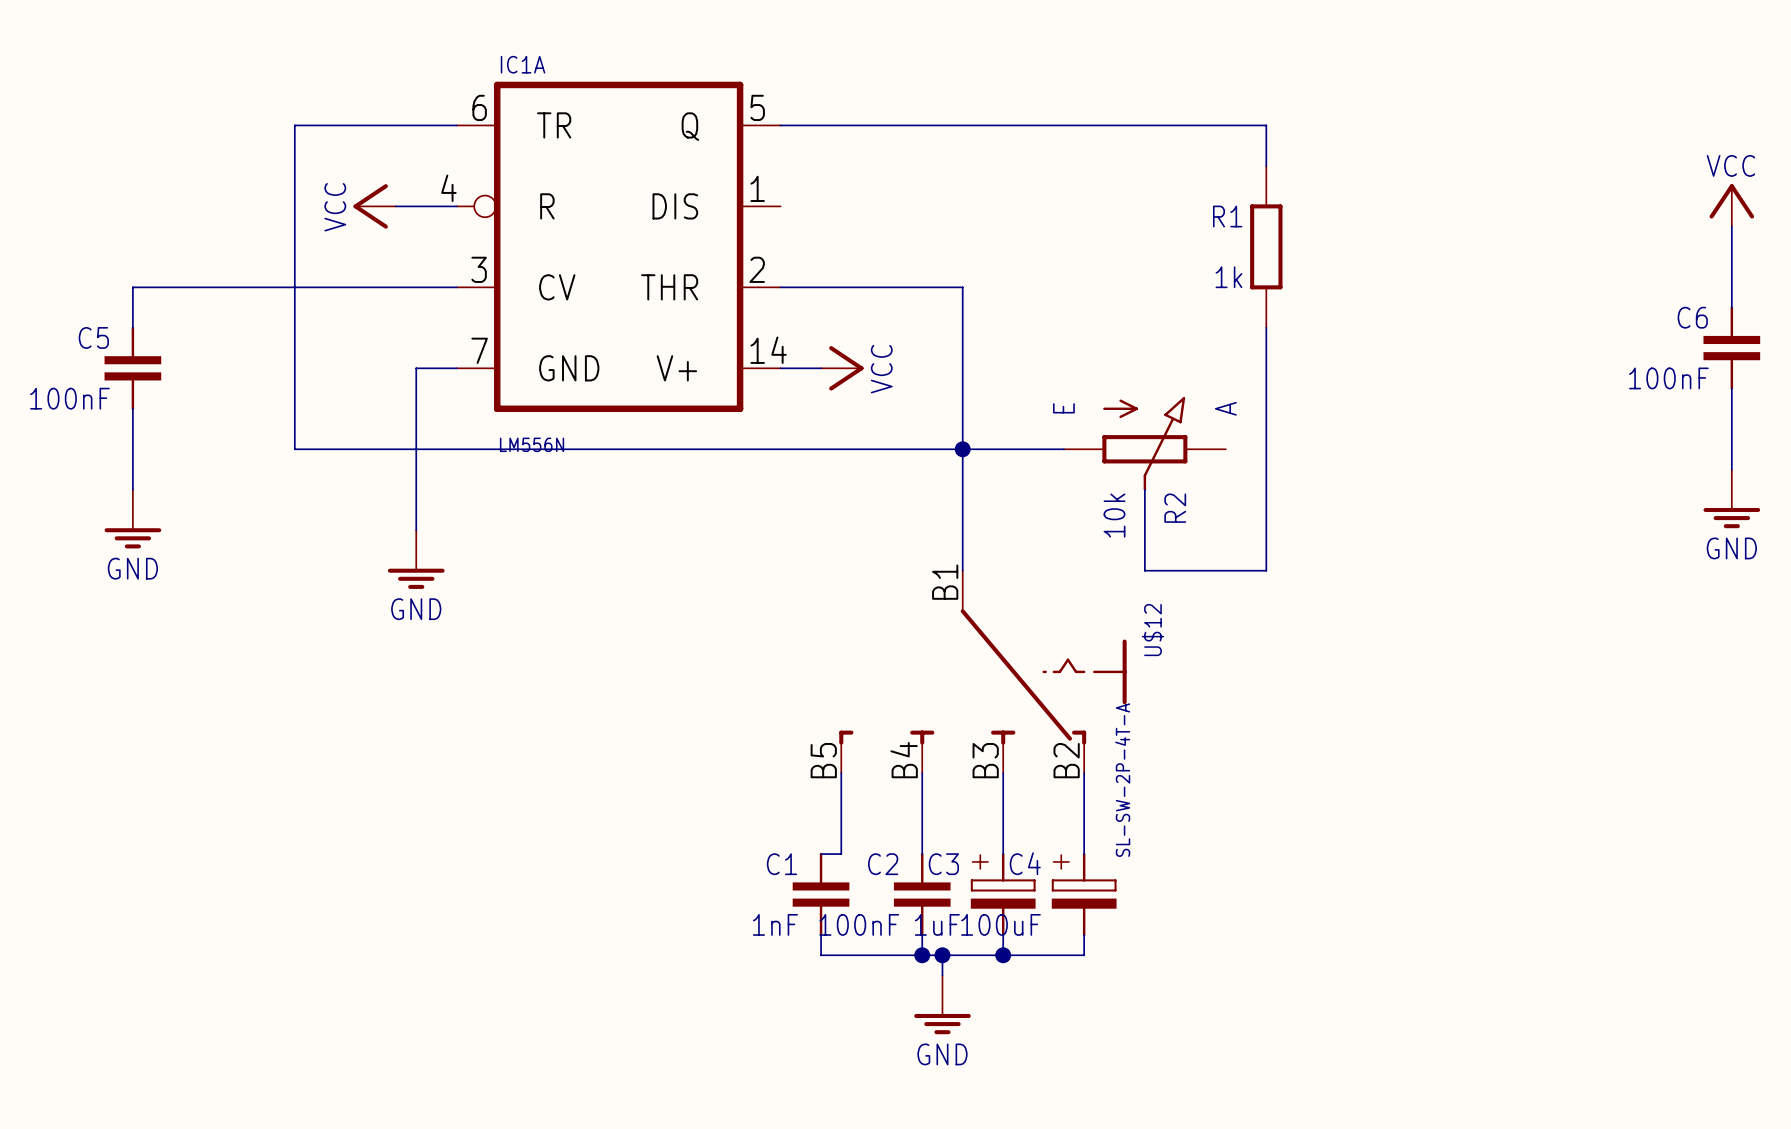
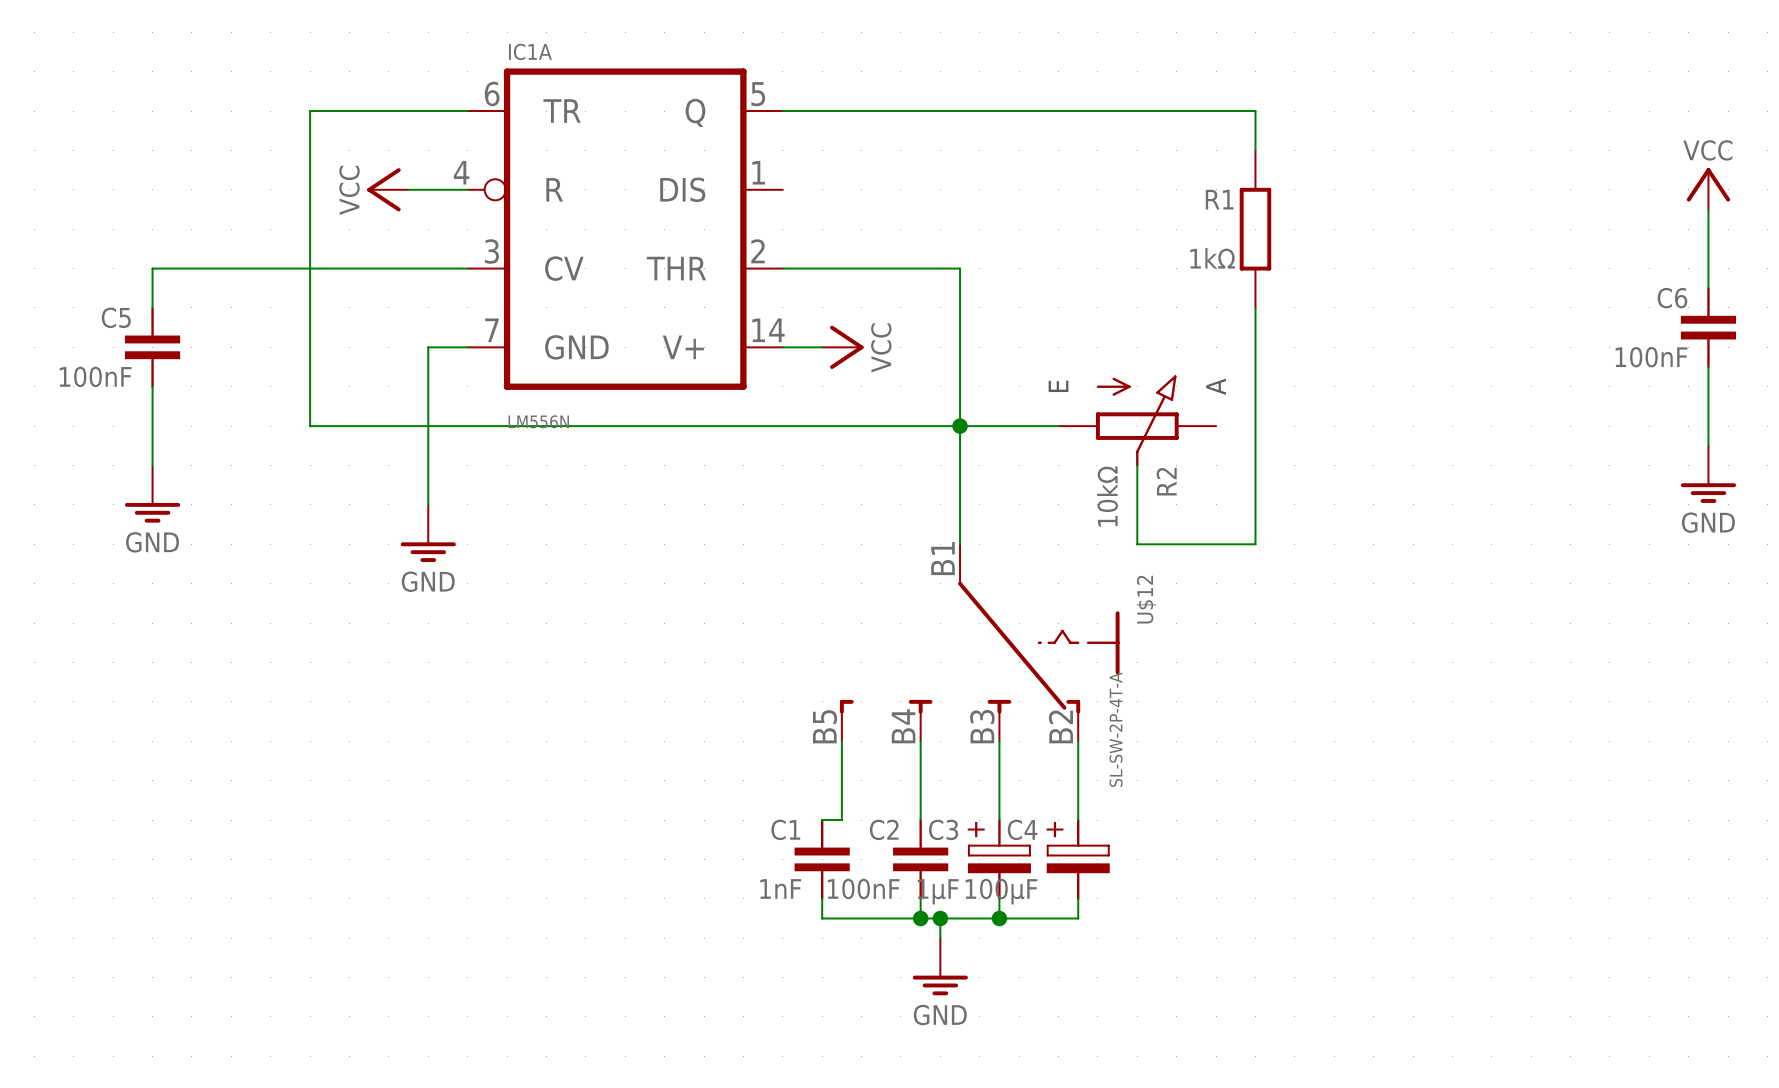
R1 value: 1k (1228, 277) -> 1kΩ (1212, 258)
R2 value: 10k (1114, 515) -> 10kΩ (1107, 496)
C3 value: 1uF (937, 924) -> 1μF (938, 891)
C4 value: 100uF (1000, 924) -> 100μF (1001, 891)

